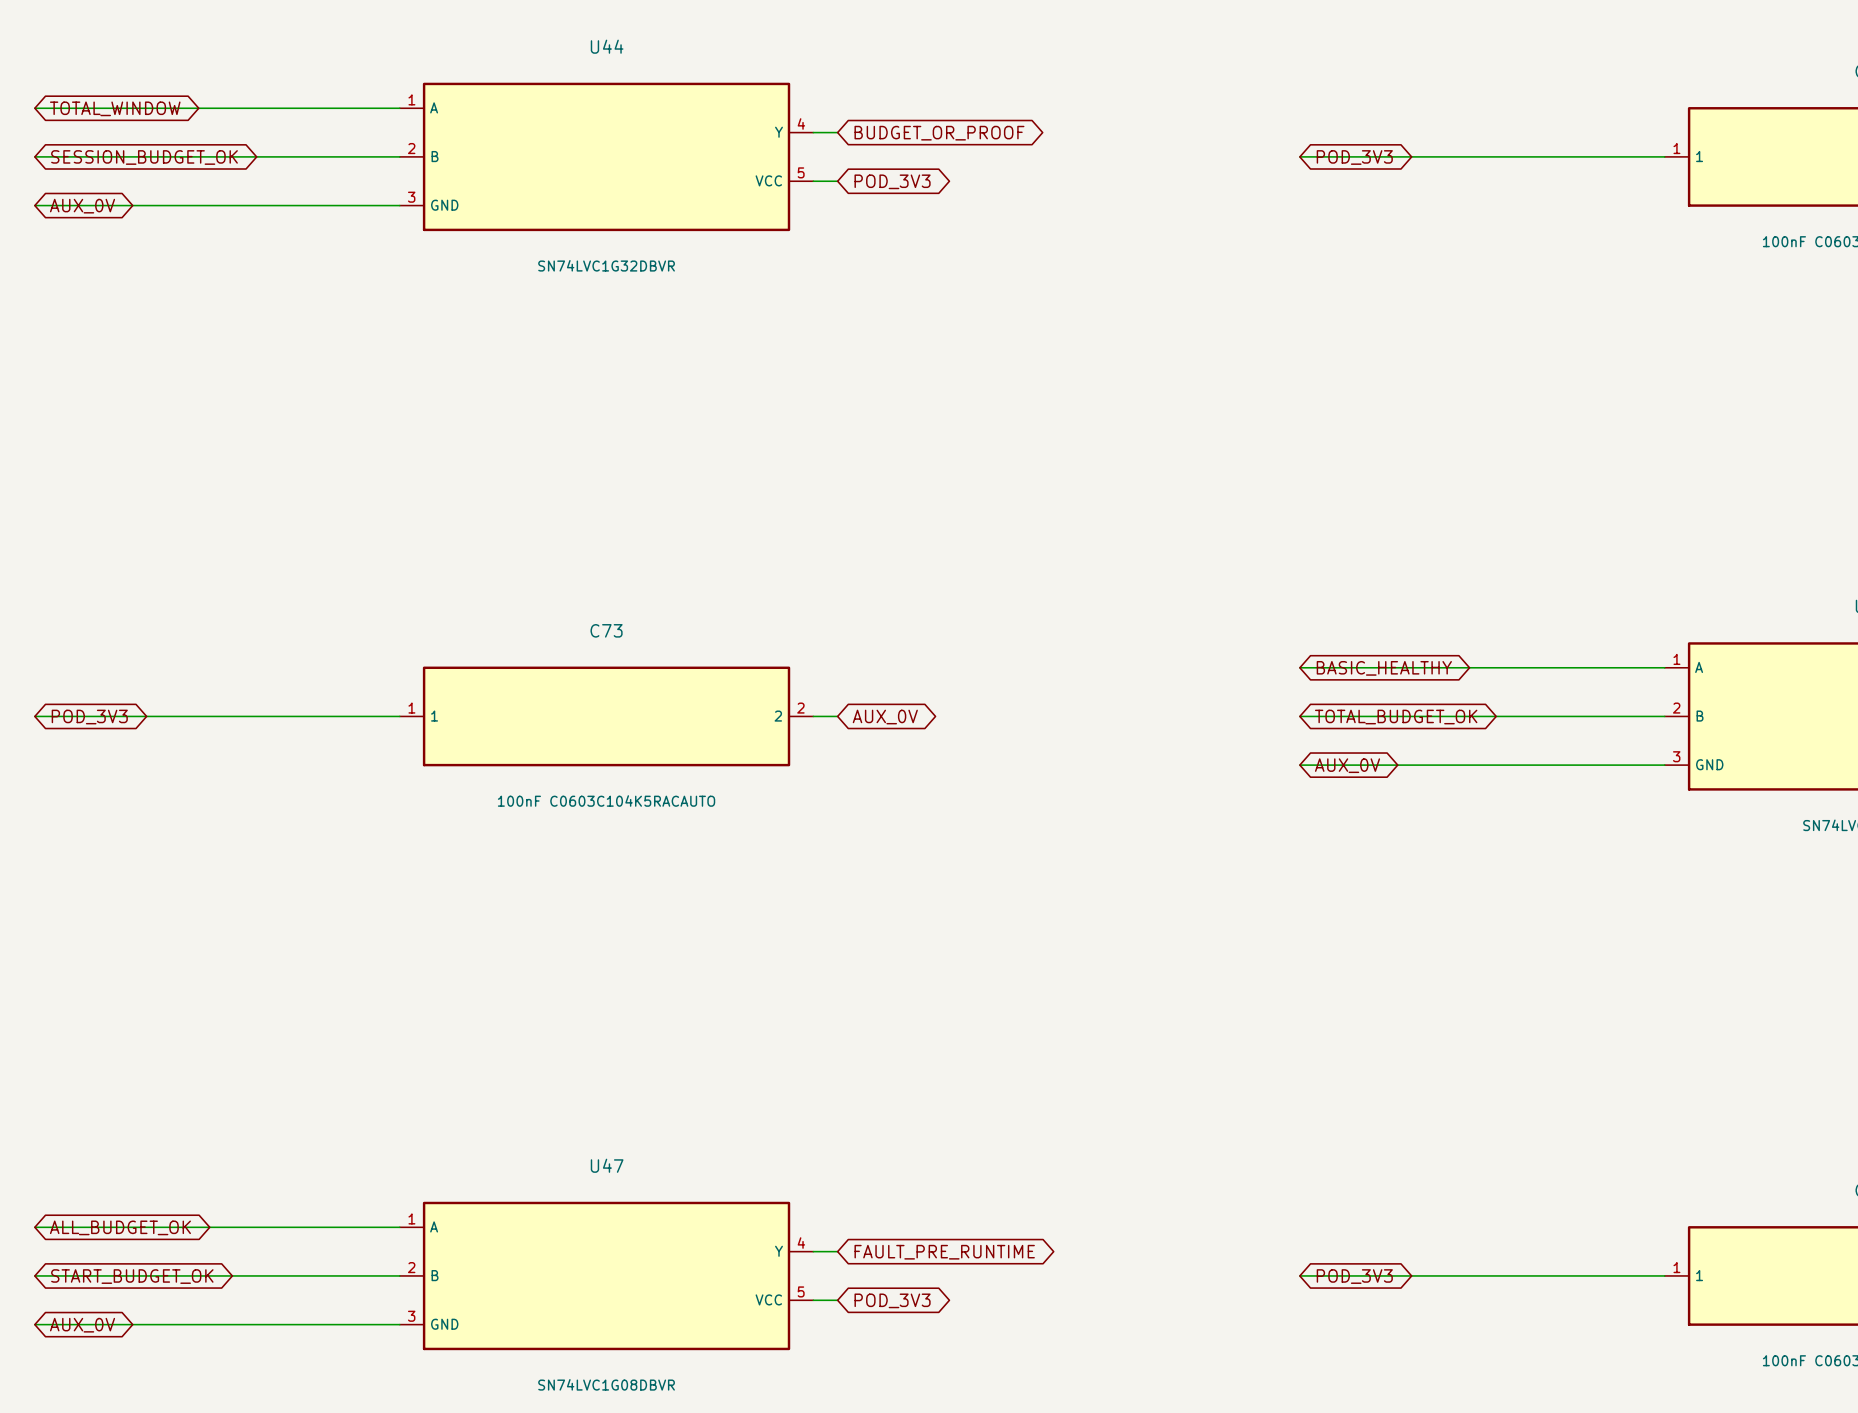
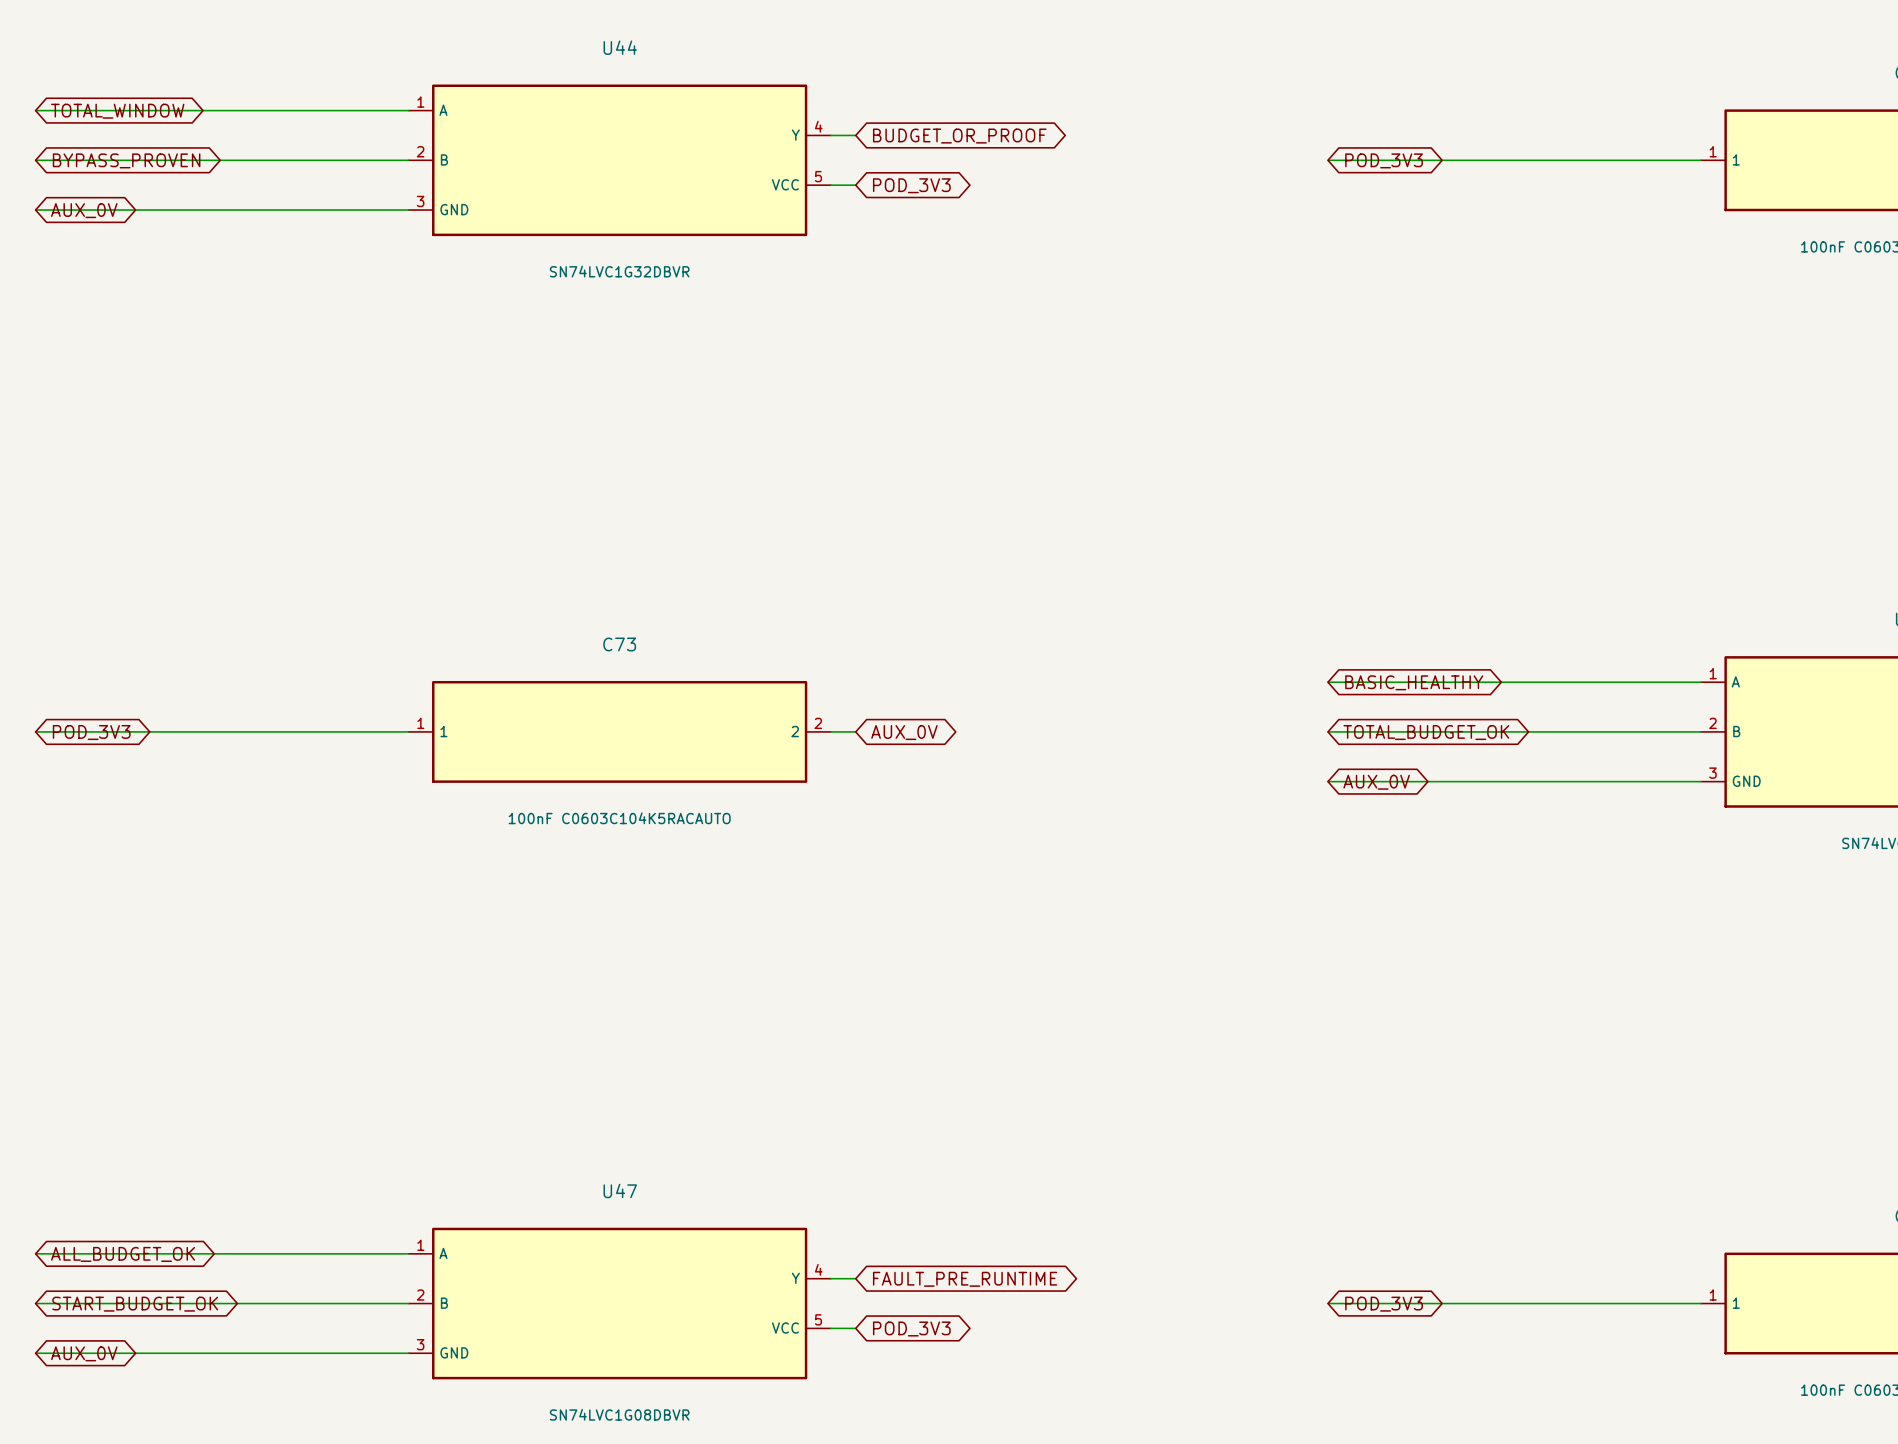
global label: SESSION_BUDGET_OK (144, 157) -> BYPASS_PROVEN (126, 160)

